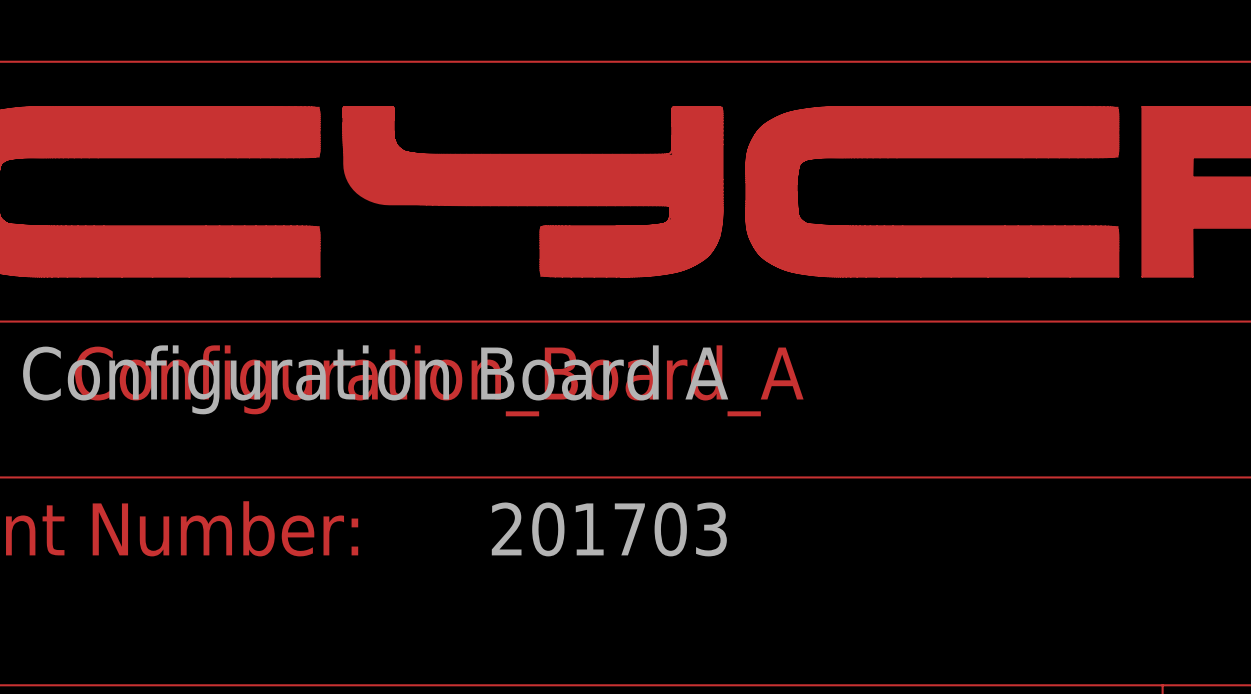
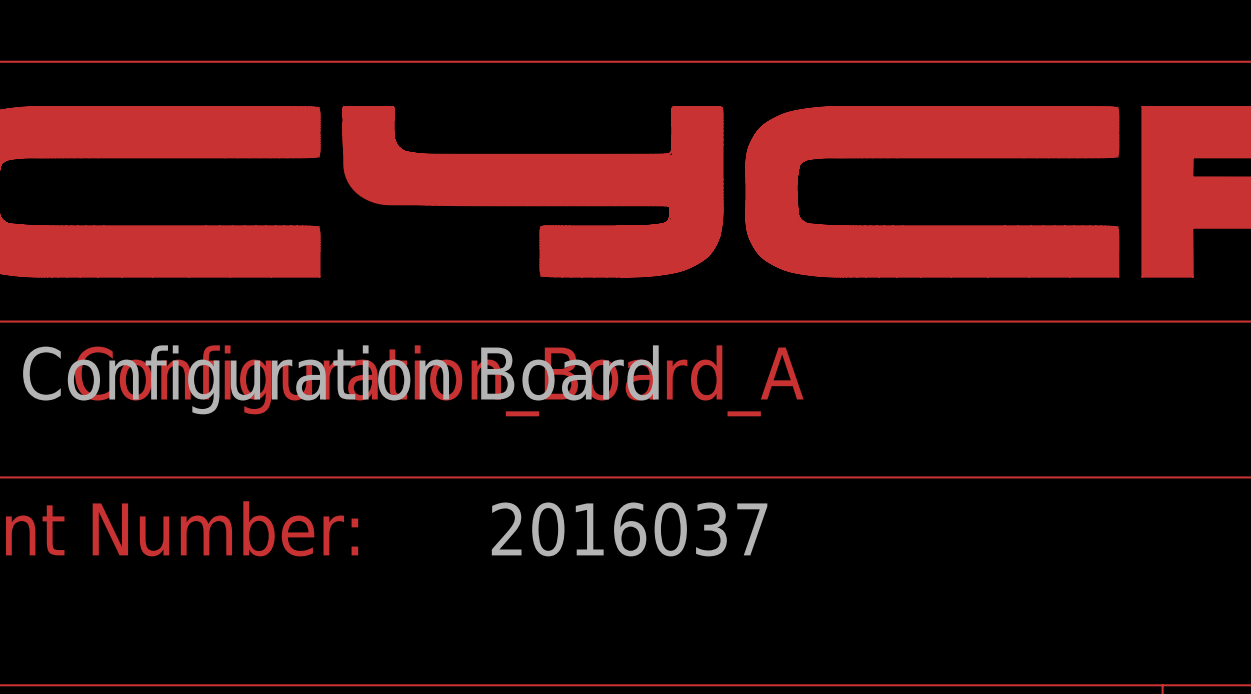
text: Configuration Board A (375, 379) -> Configuration Board (340, 379)
text: 201703 (609, 529) -> 2016037 (629, 529)

